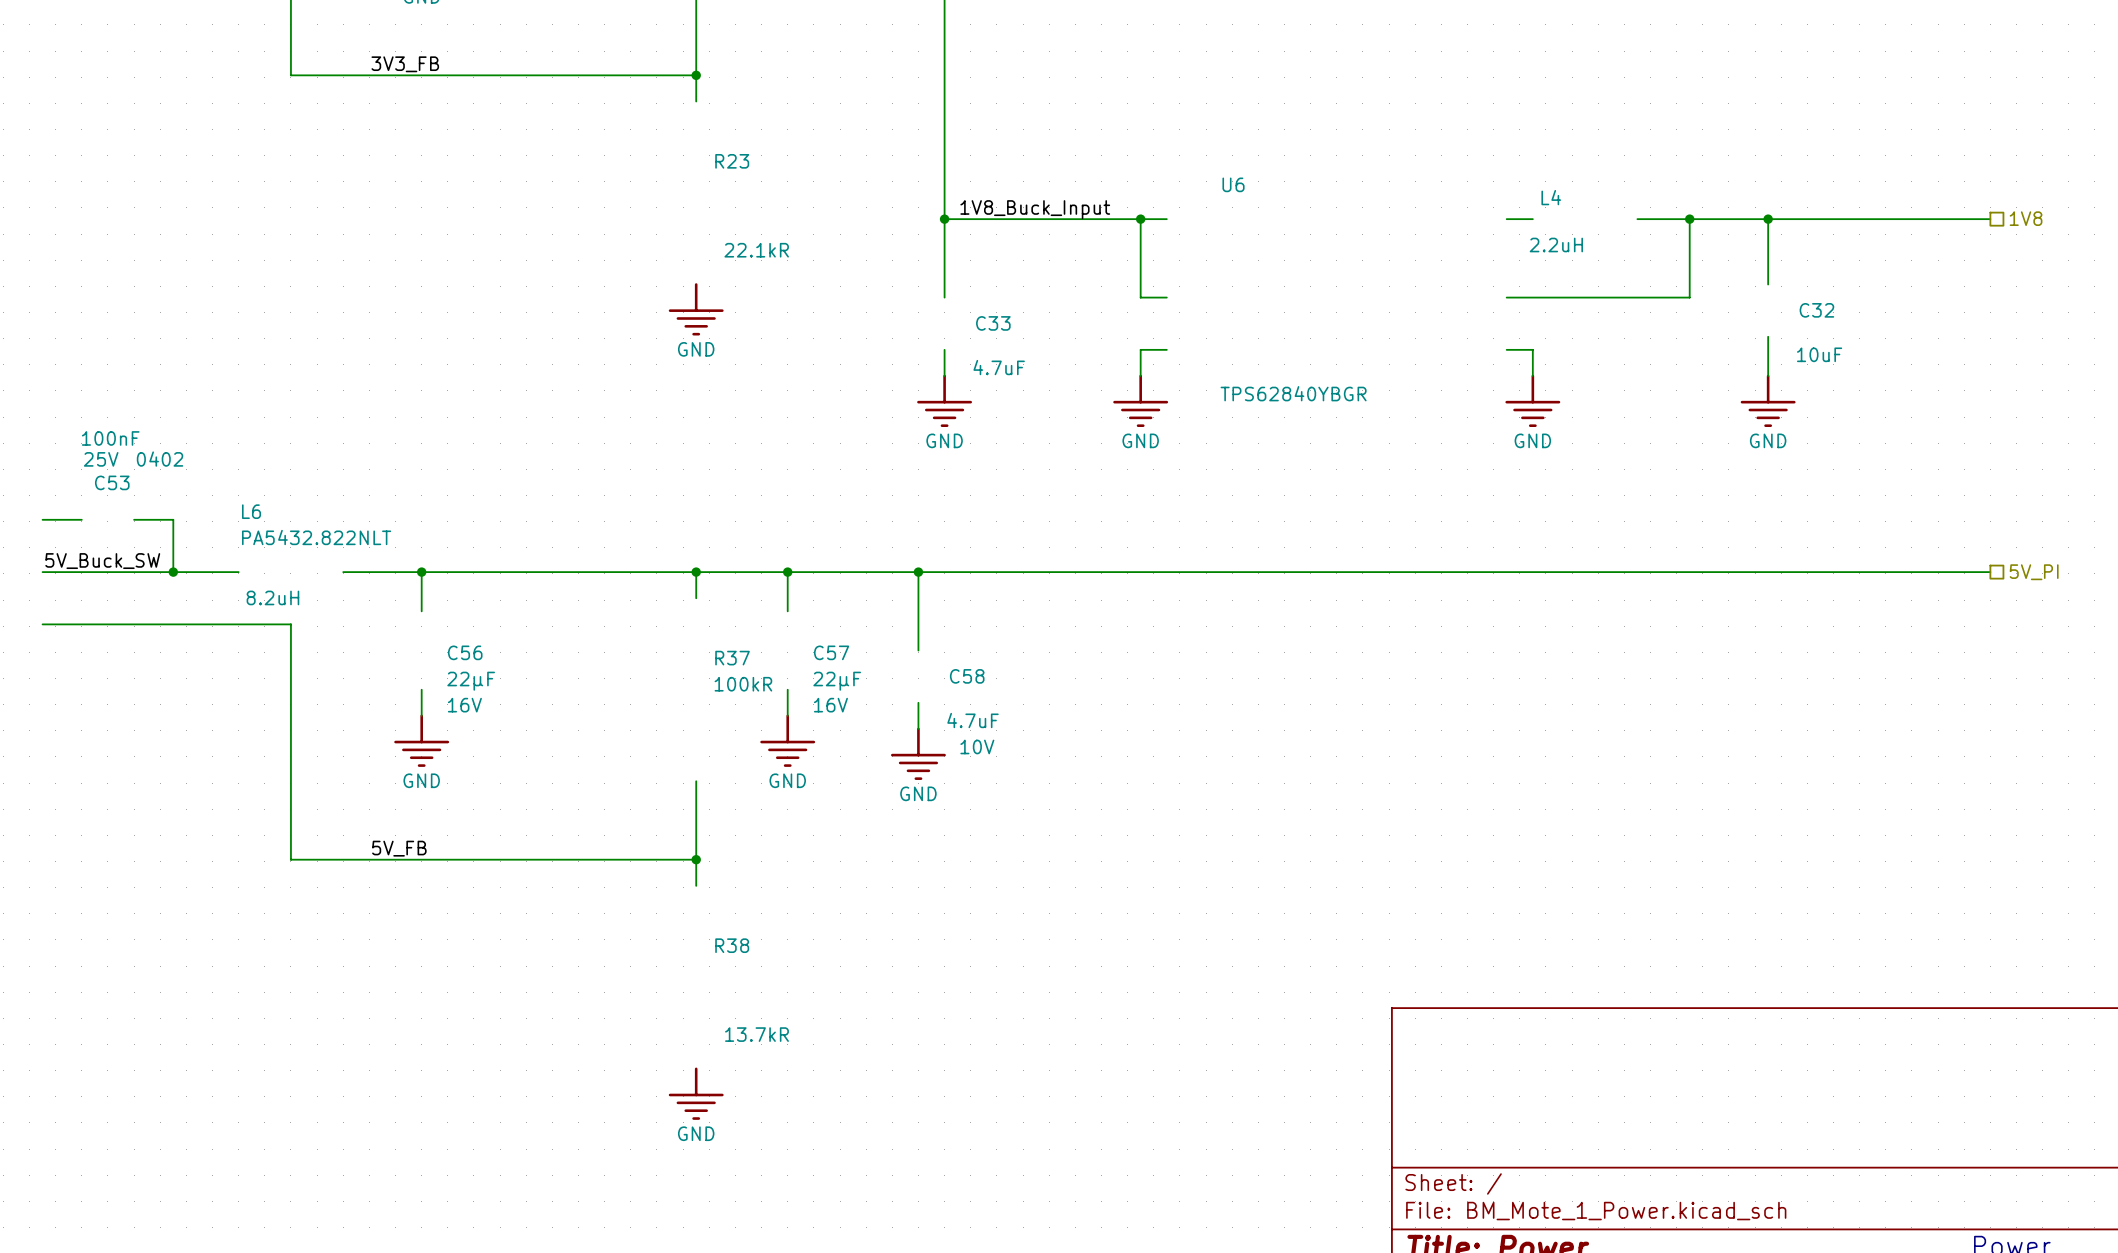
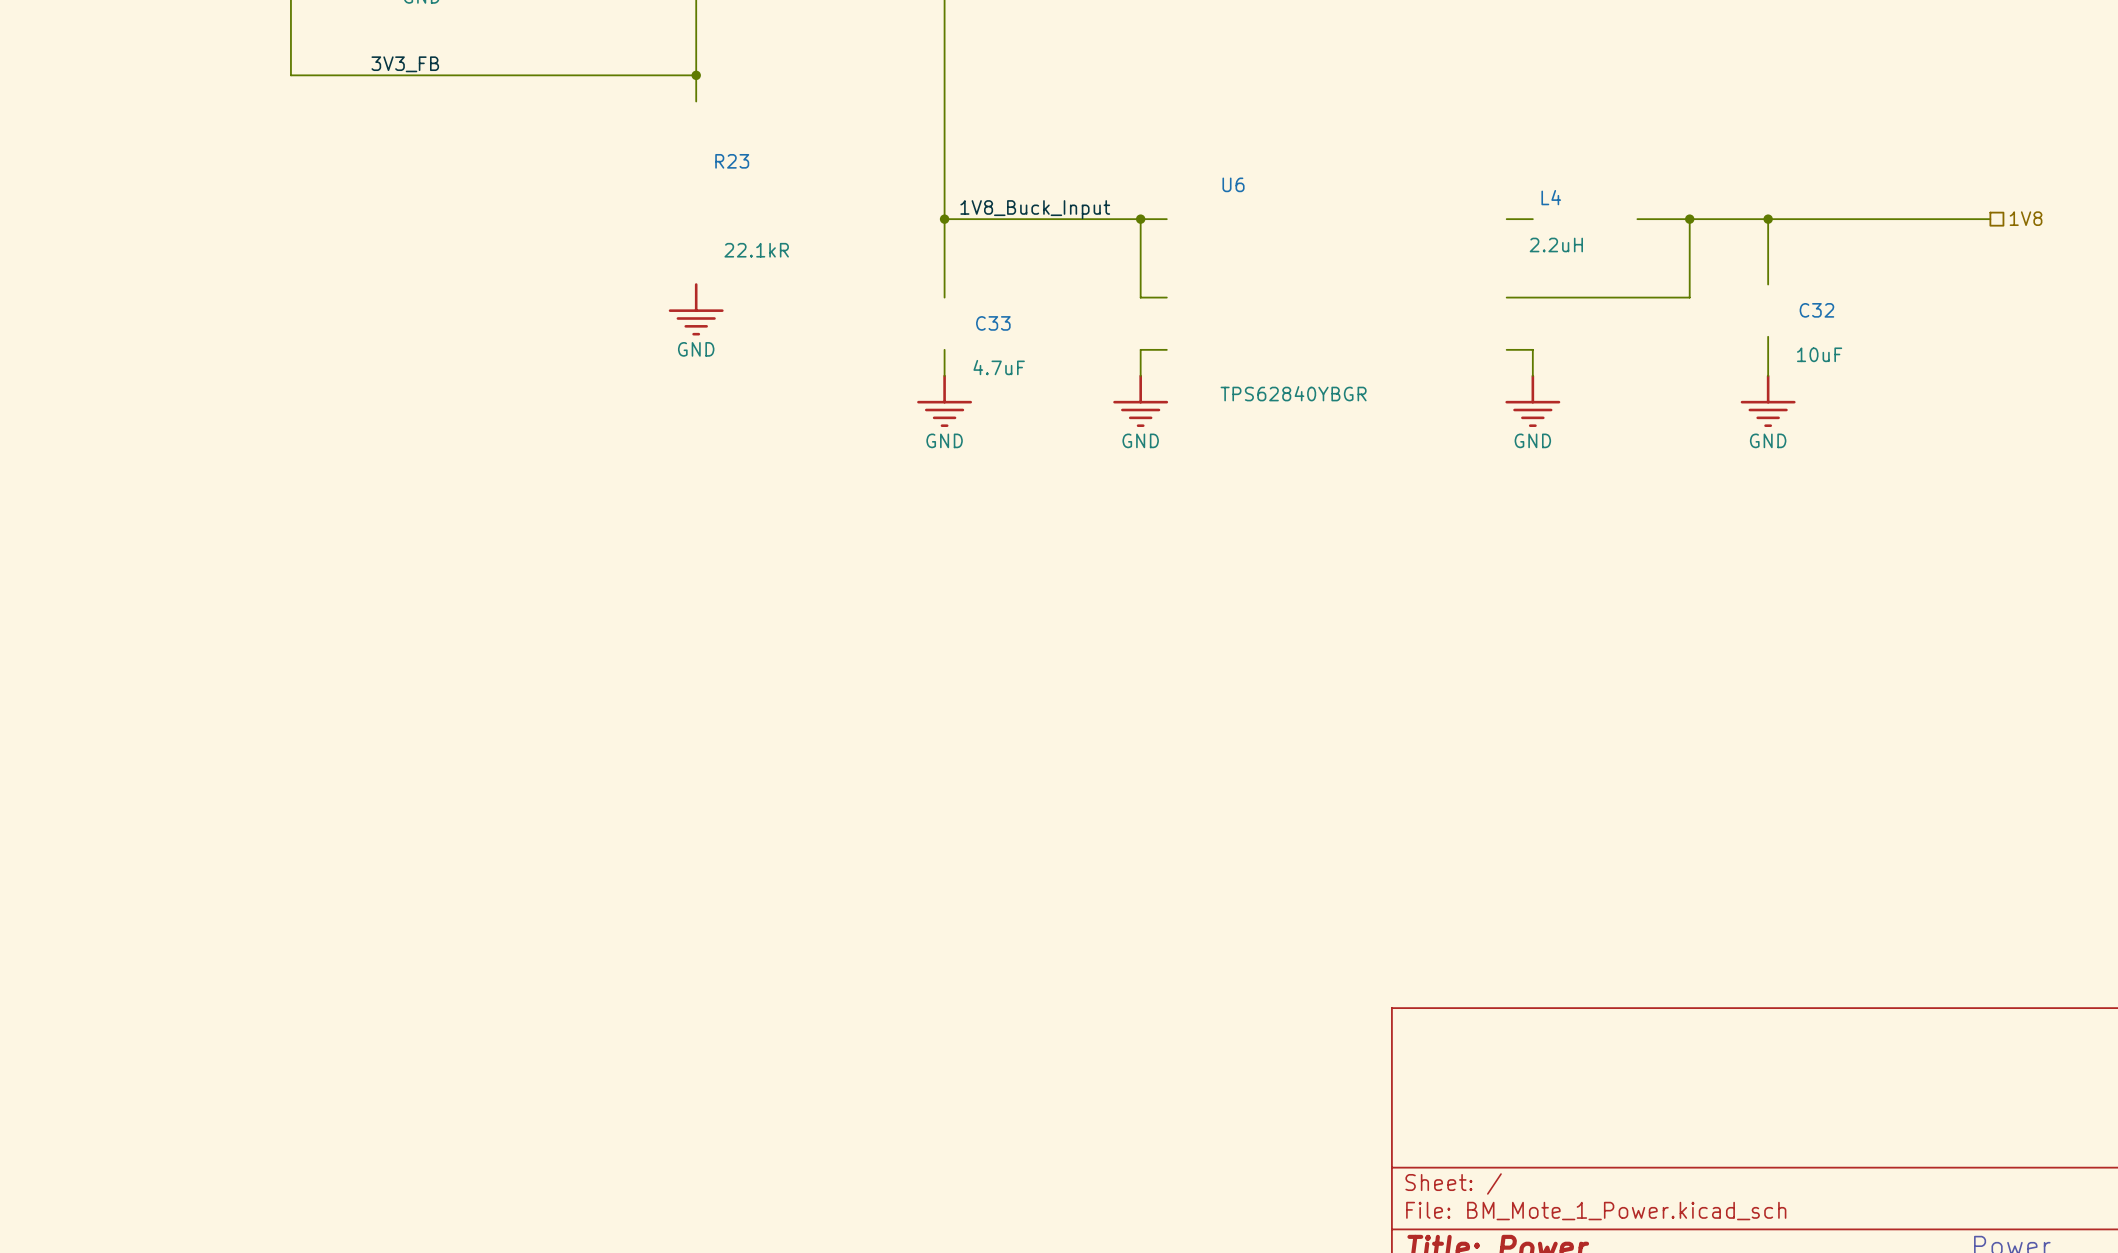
C53: (132, 460) -> none
wire: (42, 519) (81, 519) -> none
wire: (134, 519) (173, 519) (173, 572) -> none
L6: PA5432.822NLT (316, 554) -> none
label: 5V_Buck_SW (102, 561) -> none
wire: (42, 572) (238, 572) -> none
junction: (173, 572) -> none
wire: (343, 572) (1990, 572) -> none
wire: (421, 572) (421, 611) -> none
junction: (421, 572) -> none
wire: (696, 572) (696, 598) -> none
junction: (696, 572) -> none
wire: (787, 572) (787, 611) -> none
junction: (787, 572) -> none
wire: (918, 572) (918, 650) -> none
junction: (918, 572) -> none
hierarchical label: 5V_PI (2034, 572) -> none
wire: (42, 624) (290, 624) (290, 859) (696, 859) -> none
R37: (743, 671) -> none
C56: (471, 679) -> none
C57: (837, 679) -> none
wire: (421, 689) (421, 715) -> none
wire: (787, 689) (787, 715) -> none
wire: (918, 702) (918, 728) -> none
C58: (973, 711) -> none
power symbol: GND (421, 740) -> none
power symbol: GND (787, 740) -> none
power symbol: GND (918, 753) -> none
wire: (696, 781) (696, 885) -> none
label: 5V_FB (399, 848) -> none
junction: (696, 859) -> none
R38: (752, 990) -> none
power symbol: GND (696, 1093) -> none

